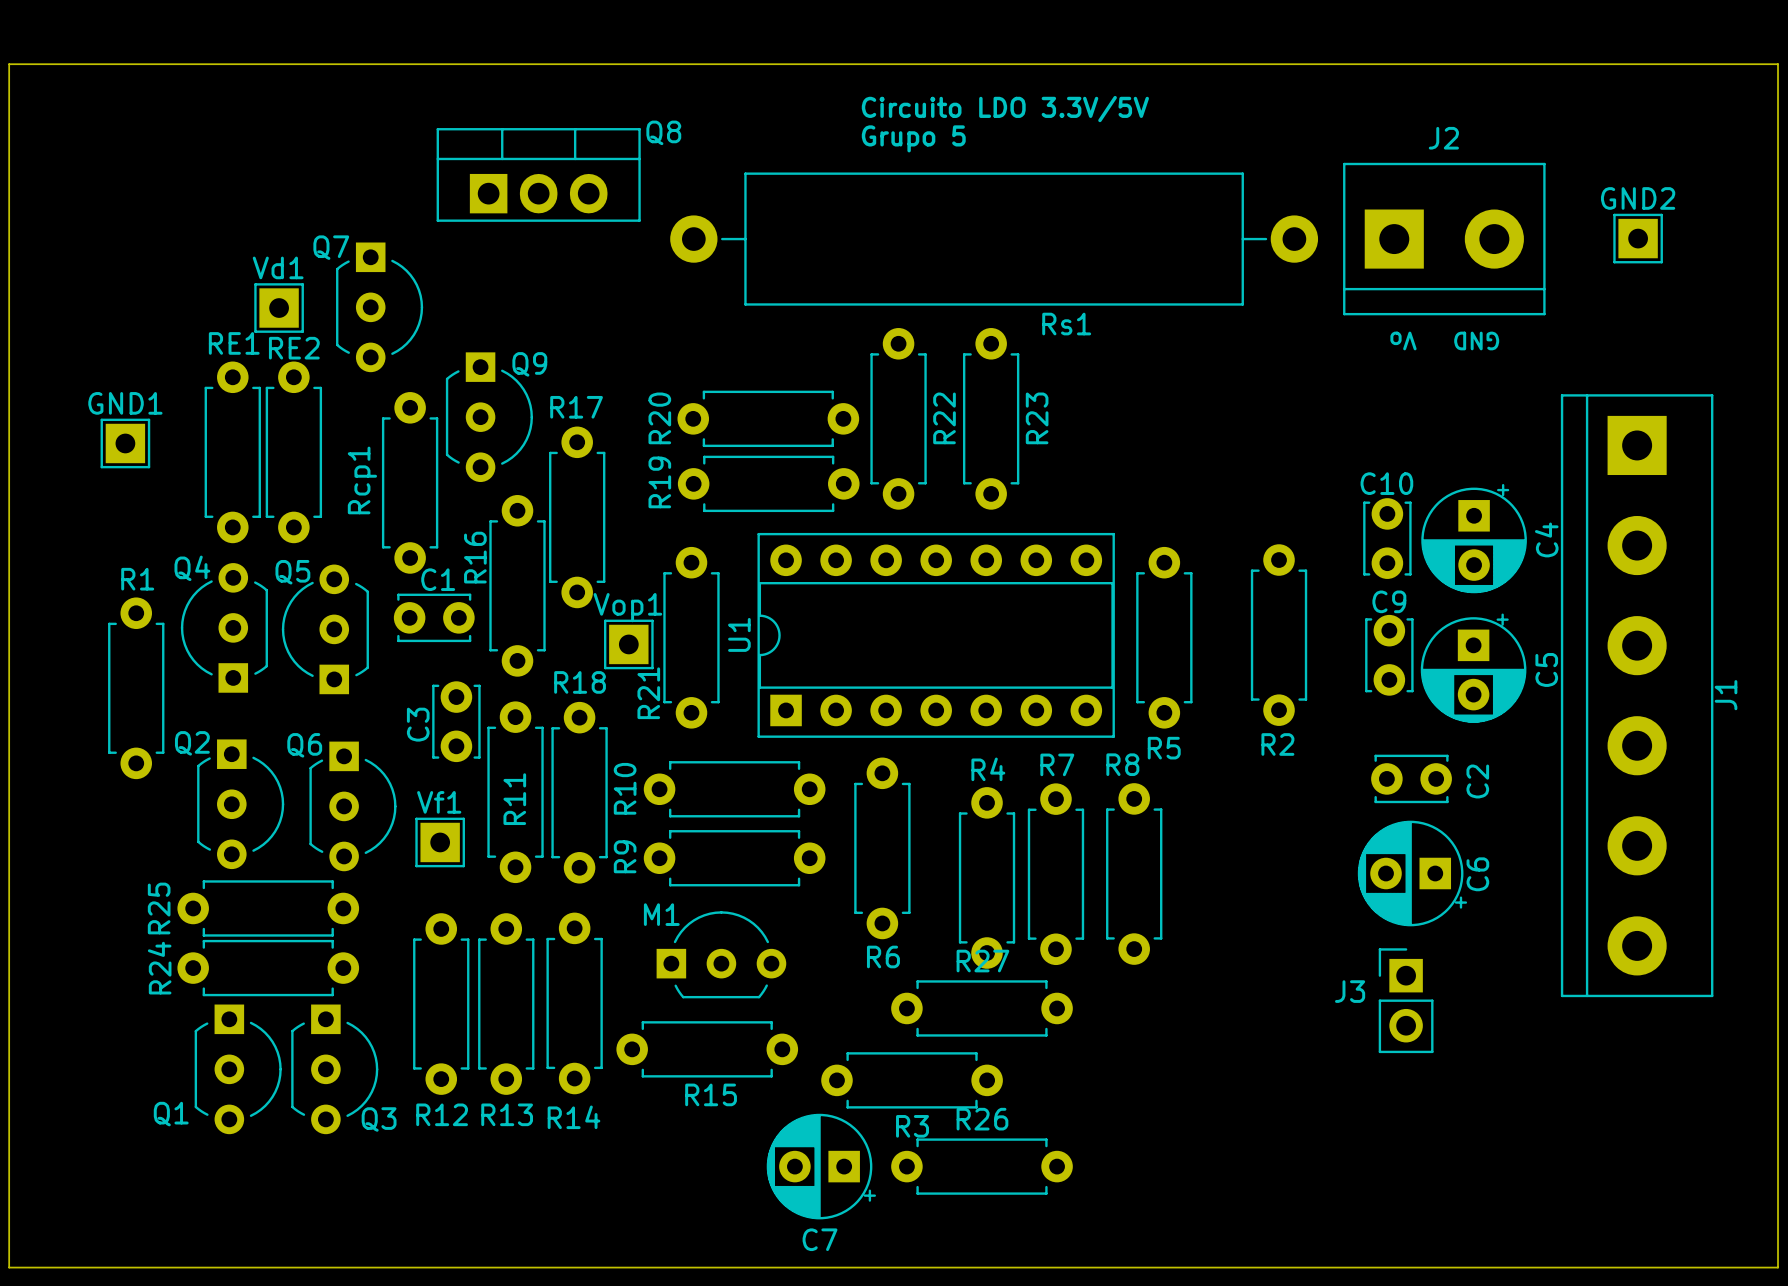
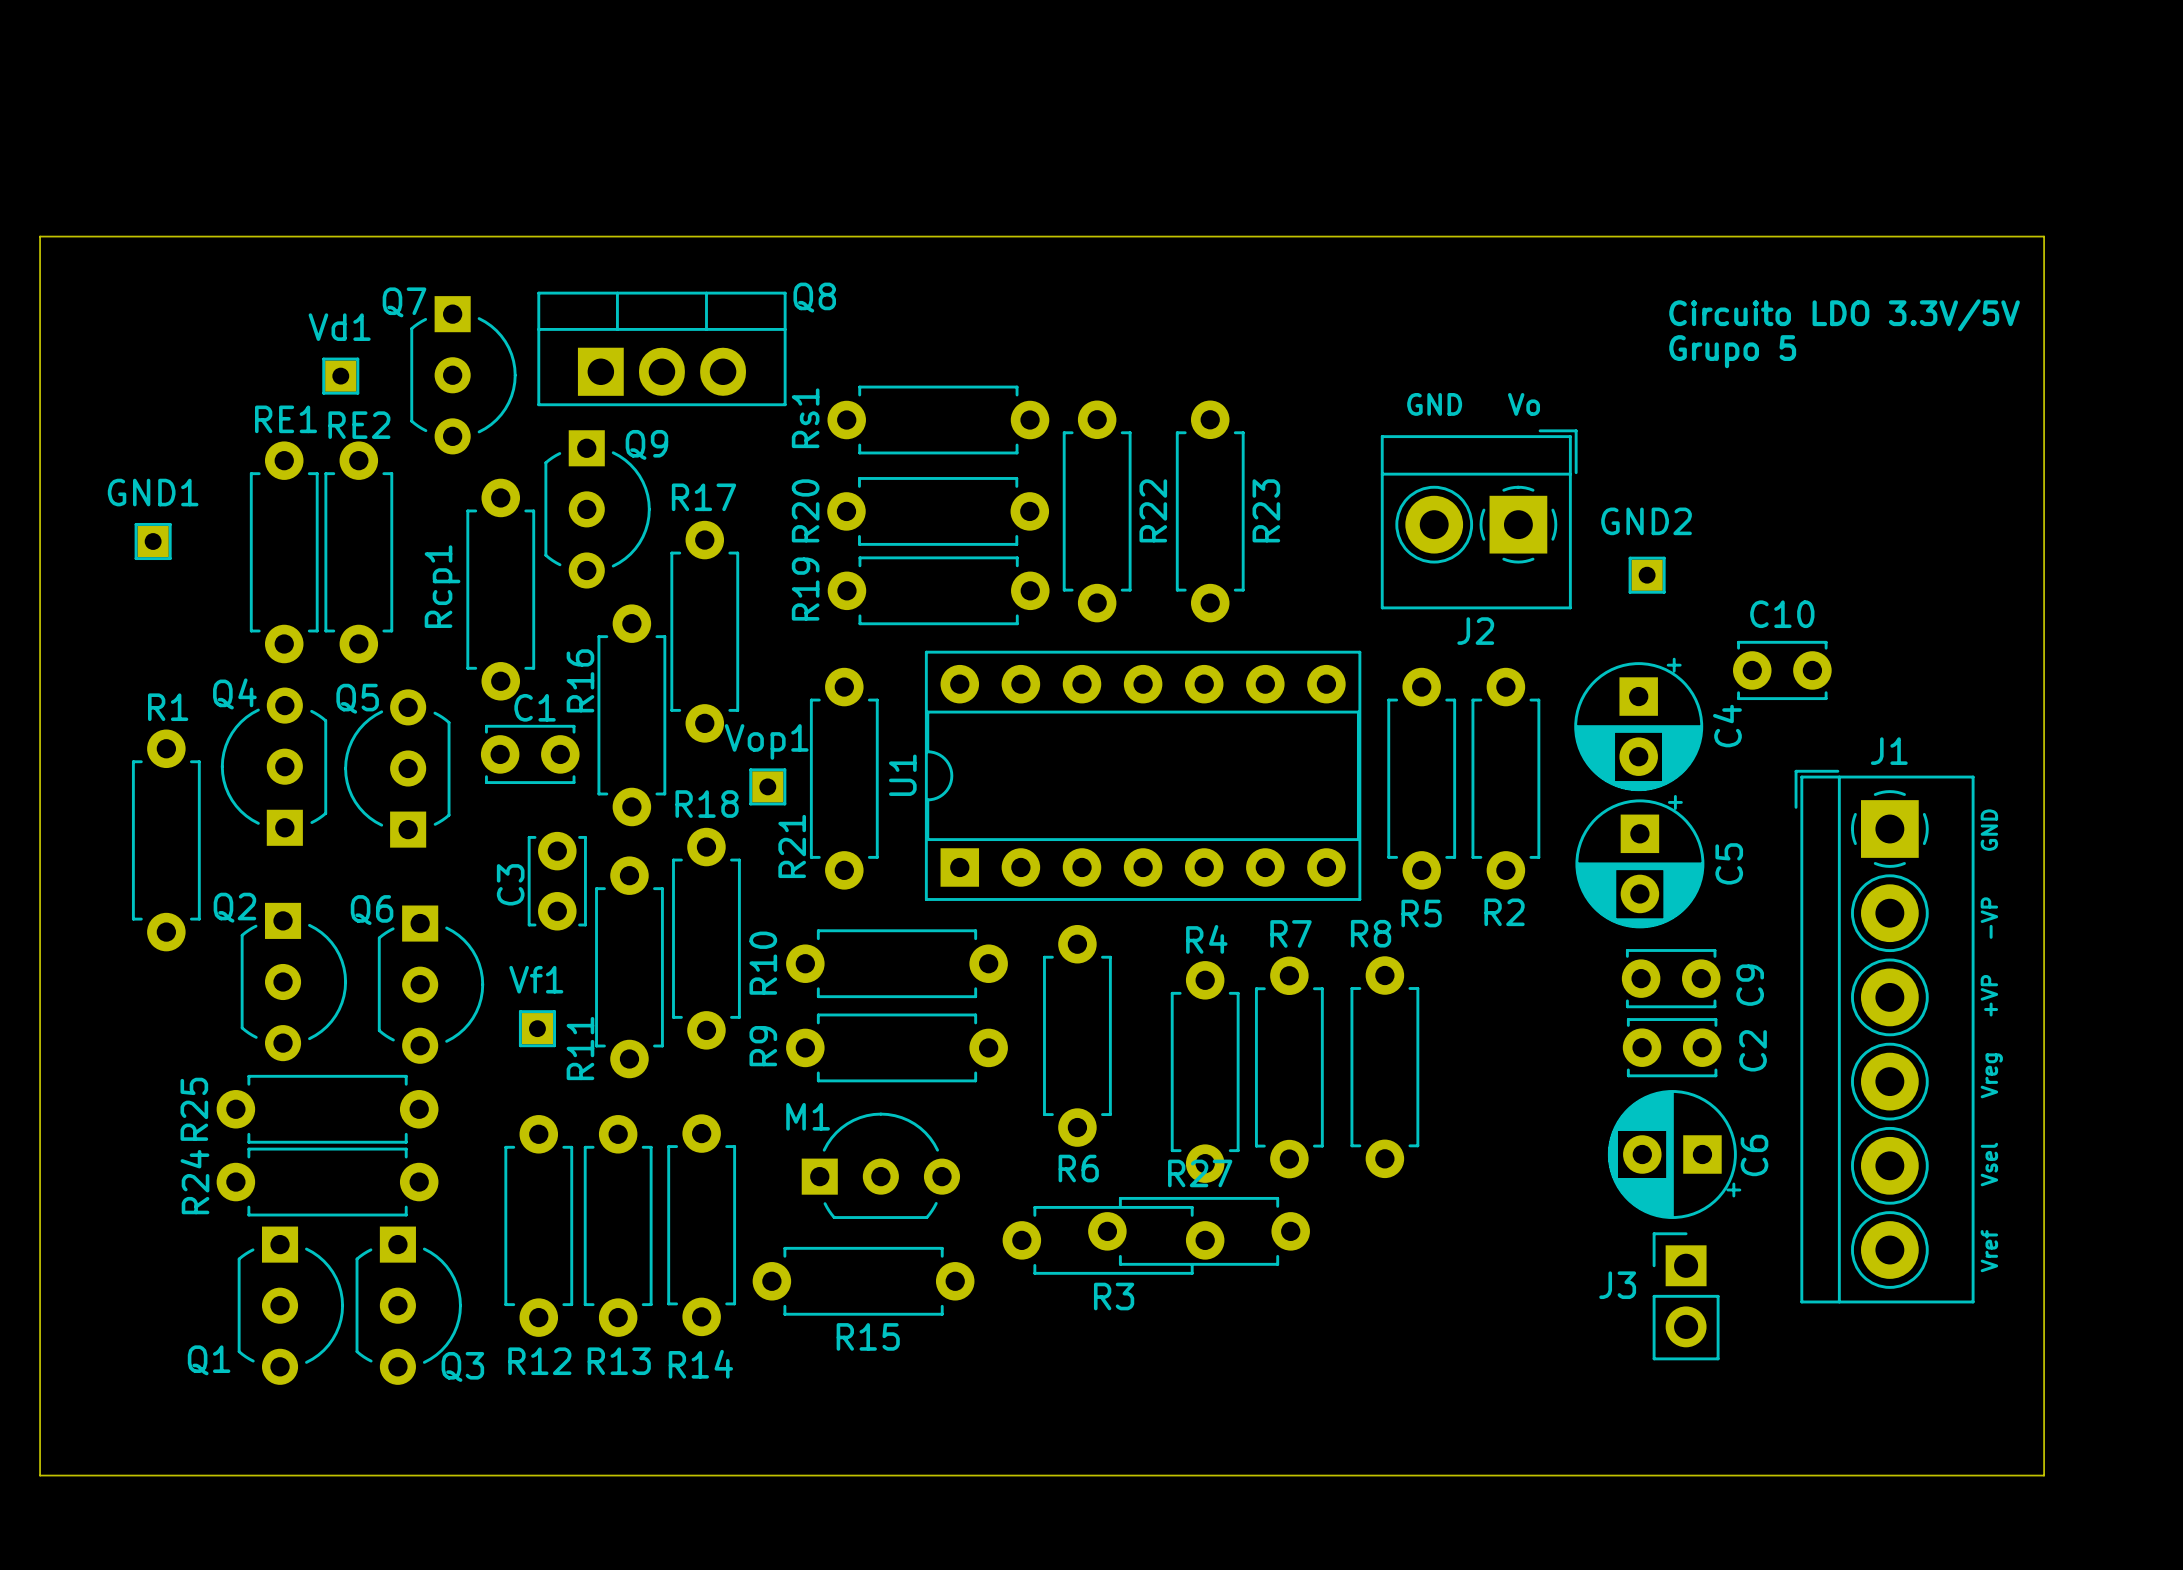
board edge: (9, 64) (1778, 64) (1778, 1267) (9, 1267) (9, 64) -> (40, 236) (40, 1475) (2044, 1475) (2044, 236) (40, 236)
text: Circuito LDO 3.3V/5V (1005, 109) -> none
text: Grupo 5 (913, 138) -> none
J2 name position: J2 (1443, 138) -> J2 (1475, 631)
J2 footprint: [1343, 162, 1546, 316] -> [1380, 429, 1578, 610]
Rs1 footprint: [670, 172, 1319, 306] -> [827, 385, 1050, 455]
Q8 position: (538, 174) -> (661, 348)
GND2 footprint: [1613, 213, 1663, 264] -> [1628, 556, 1666, 594]
text: none -> Circuito LDO 3.3V/5V (1844, 315)
Vd1 footprint: [254, 283, 304, 333] -> [322, 357, 360, 395]
text: none -> Grupo 5 (1732, 351)
Rs1 name position: Rs1 (1066, 324) -> Rs1 (805, 418)
text rotation: 0° (1444, 340) -> 180° (1473, 404)
text position: GND Vo (1444, 340) -> GND Vo (1473, 404)
J1 footprint: [1560, 394, 1714, 998] -> [1794, 769, 1975, 1304]
GND1 footprint: [100, 418, 151, 469] -> [134, 522, 172, 561]
C10 rotation: 0° (1387, 538) -> 90° clockwise (1782, 670)
C10 position: (1387, 538) -> (1782, 670)
C4 position: (1474, 538) -> (1638, 724)
Vop1 footprint: [603, 619, 654, 670] -> [749, 768, 787, 806]
R2 position: (1279, 635) -> (1505, 778)
C9 rotation: 0° (1389, 655) -> 90° clockwise (1671, 978)
C9 position: (1389, 655) -> (1671, 978)
C5 position: (1473, 668) -> (1639, 861)
J1 name position: J1 (1726, 695) -> J1 (1889, 751)
C2 position: (1411, 778) -> (1672, 1047)
R18 position: (579, 792) -> (706, 938)
R11 name position: R11 (514, 799) -> R11 (580, 1048)
Vf1 footprint: [415, 817, 465, 868] -> [518, 1010, 556, 1048]
text: none -> Vref Vsel Vreg +VP -VP GND (1991, 1040)
C6 position: (1412, 873) -> (1674, 1154)
J3 position: (1406, 1000) -> (1686, 1296)
R3 position: (912, 1080) -> (1113, 1240)
C7: (821, 1166) -> none
R26: (982, 1166) -> none

